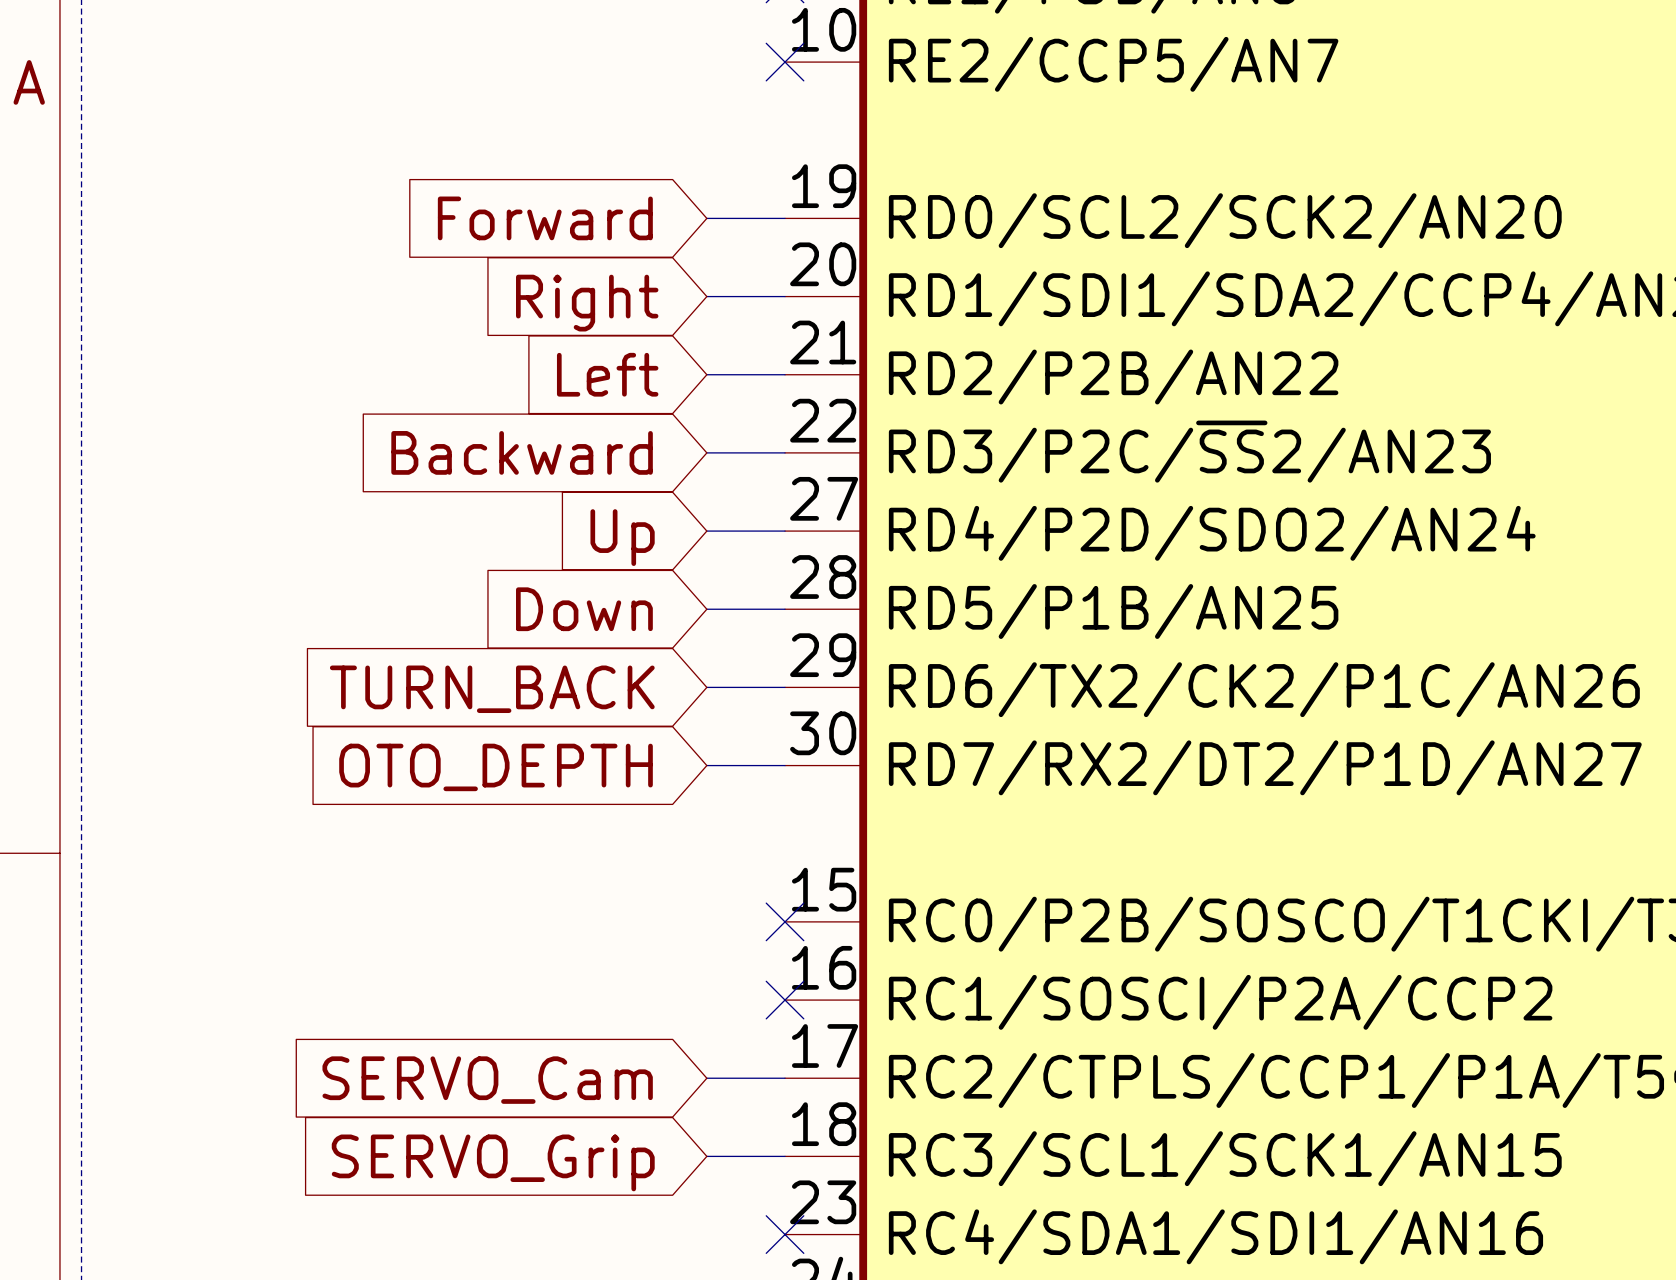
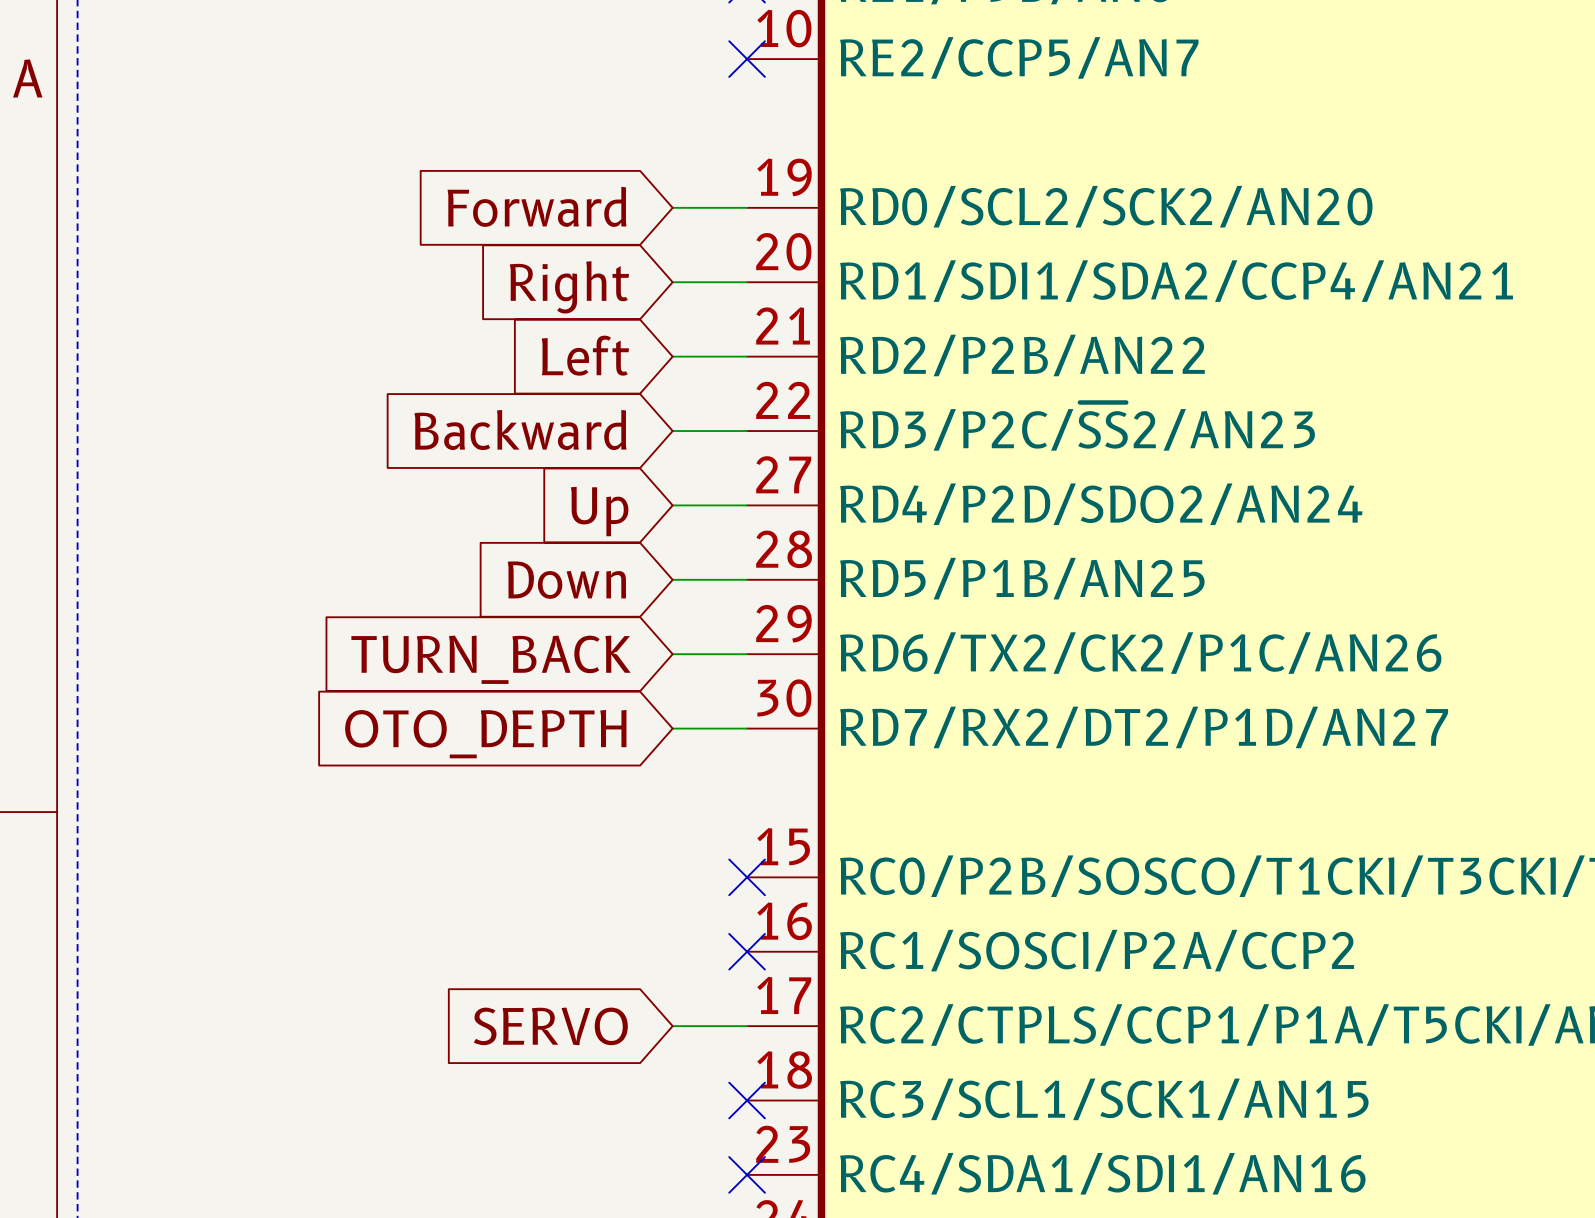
global label: SERVO_Cam (487, 1080) -> SERVO (550, 1026)
wire: (706, 1156) (785, 1156) -> none
no-connect mark: none -> (747, 1100)
global label: SERVO_Grip (493, 1162) -> none

